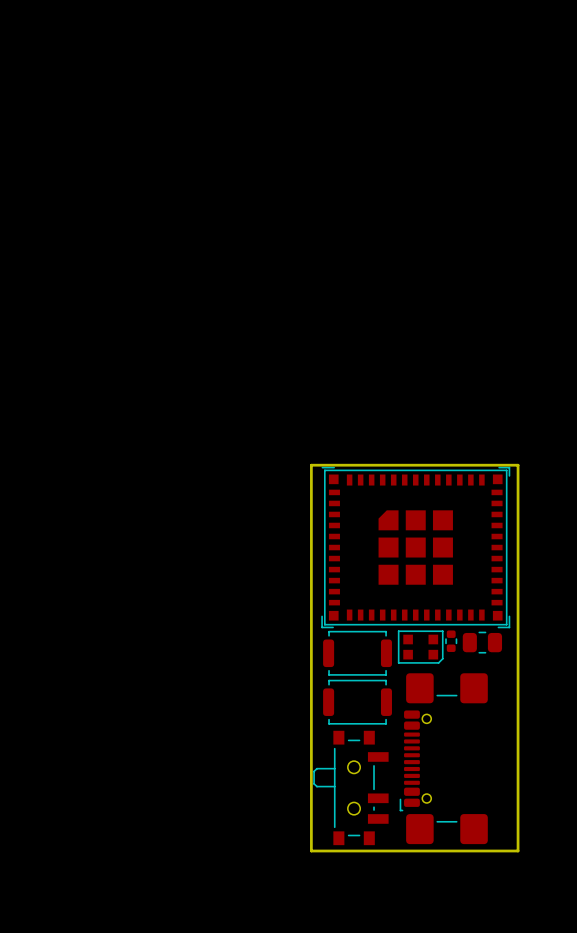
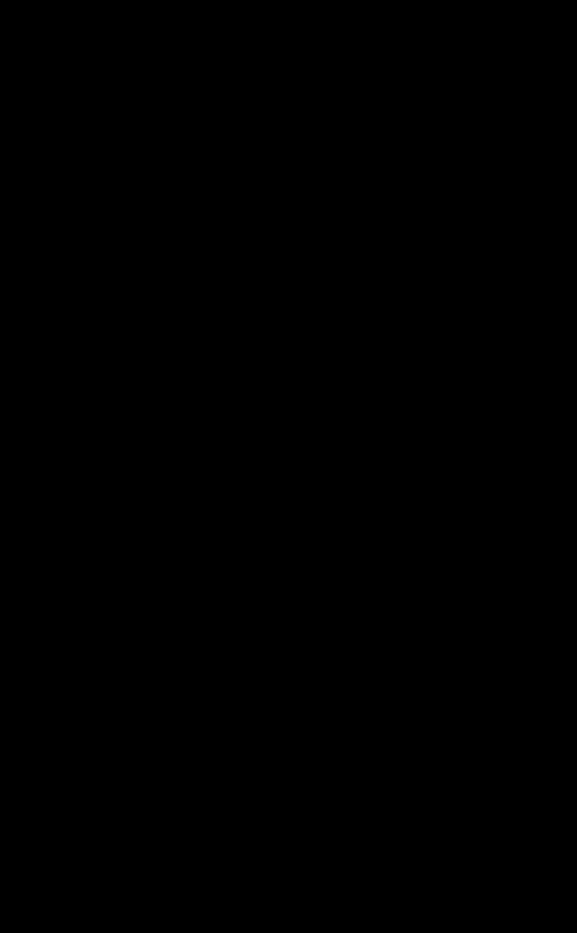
board edge: (311, 465) (518, 465) (518, 850) (311, 850) (311, 465) -> none
part: (415, 547) -> none
part: (451, 641) -> none
part: (482, 642) -> none
part: (420, 647) -> none
part: (357, 653) -> none
part: (357, 702) -> none
part: (443, 758) -> none
part: (350, 787) -> none

